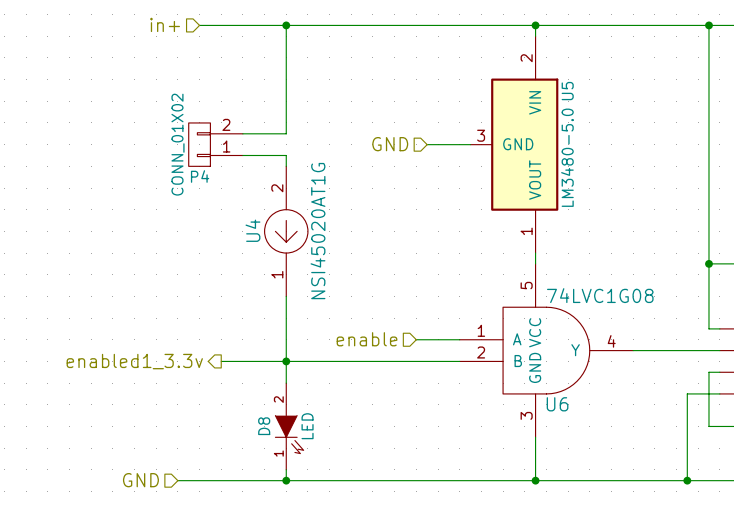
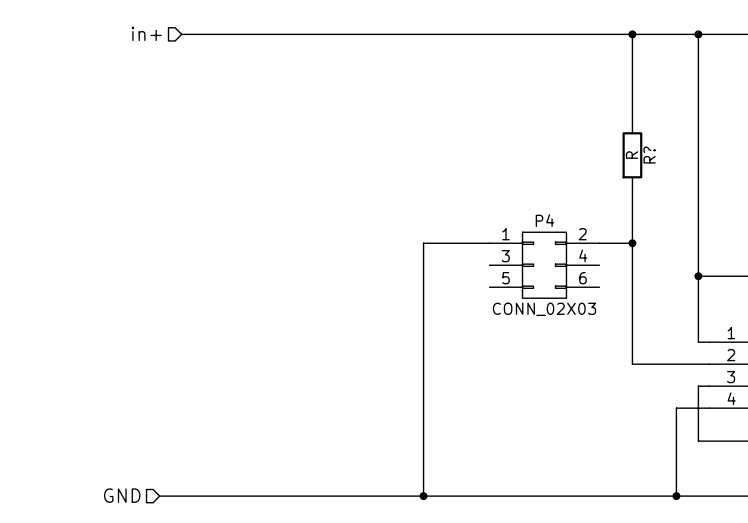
wire: (286, 25) (286, 133) (242, 133) -> none
junction: (286, 25) -> none
wire: (535, 25) (535, 36) -> none
junction: (535, 25) -> none
wire: none -> (632, 34) (632, 122)
junction: none -> (632, 34)
P4 symbol: [188, 122, 243, 167] -> [489, 232, 600, 299]
P4 value: CONN_01X02 (177, 144) -> CONN_02X03 (544, 309)
hierarchical label: GND (390, 144) -> none
wire: (427, 144) (470, 144) -> none
U5: LM3480-5.0 (514, 144) -> none
R?: none -> R (632, 155)
wire: (242, 155) (286, 155) (286, 166) -> none
P4 name position: P4 (200, 176) -> P4 (545, 220)
U4: NSI45020AT1G (286, 231) -> none
wire: none -> (489, 243) (423, 243) (423, 496)
wire: none -> (599, 243) (632, 243)
junction: none -> (632, 243)
wire: (286, 296) (286, 383) -> none
hierarchical label: enable (367, 339) -> none
wire: (416, 339) (459, 339) -> none
U6: 74LVC1G08 (546, 350) -> none
wire: (633, 350) (643, 350) -> (632, 188) (632, 364)
hierarchical label: enabled1_3.3v (134, 361) -> none
wire: (221, 361) (459, 361) -> none
junction: (286, 361) -> none
D8: LED (289, 426) -> none
wire: (535, 437) (535, 480) -> none
wire: (286, 469) (286, 480) -> none
junction: (286, 480) -> none
junction: none -> (423, 496)
junction: (535, 480) -> none

